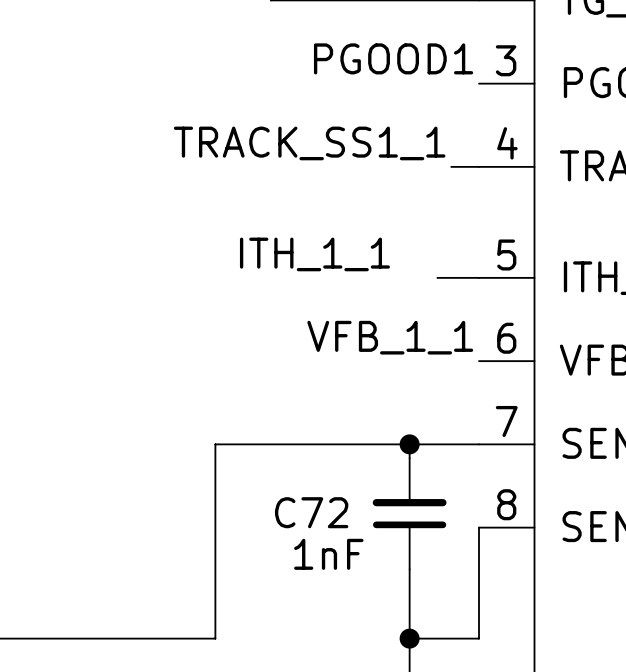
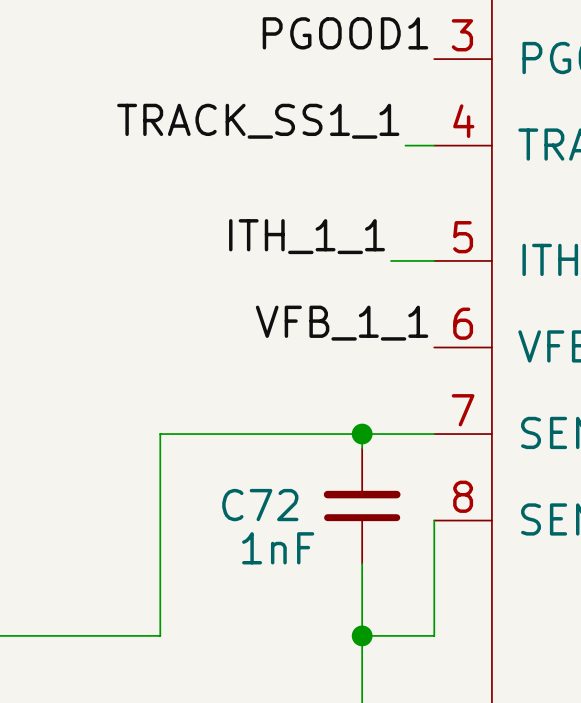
label position: ITH_1_1 (314, 254) -> ITH_1_1 (307, 236)

